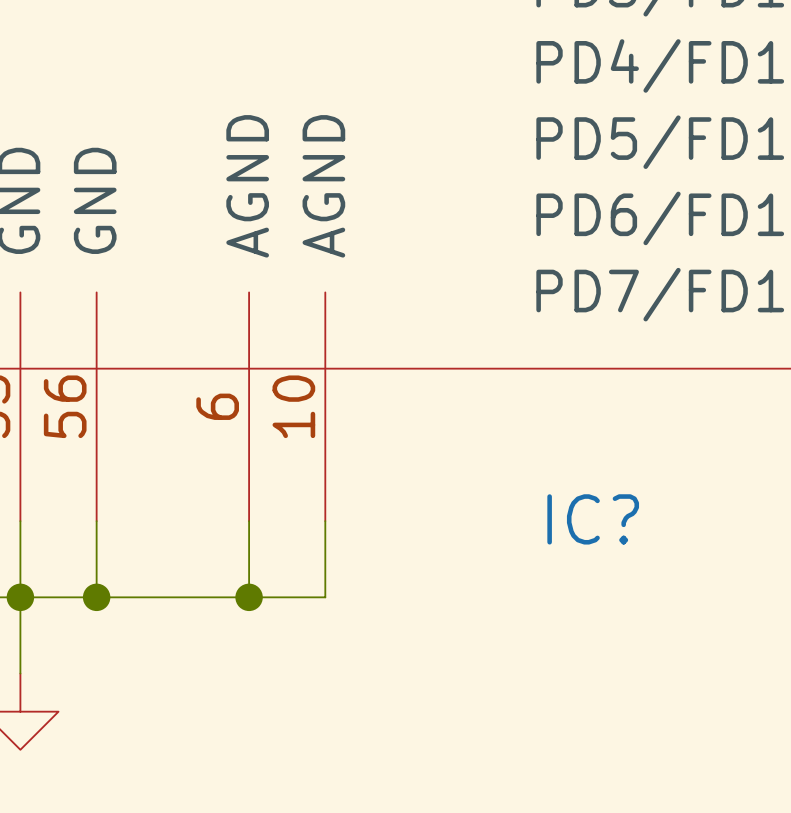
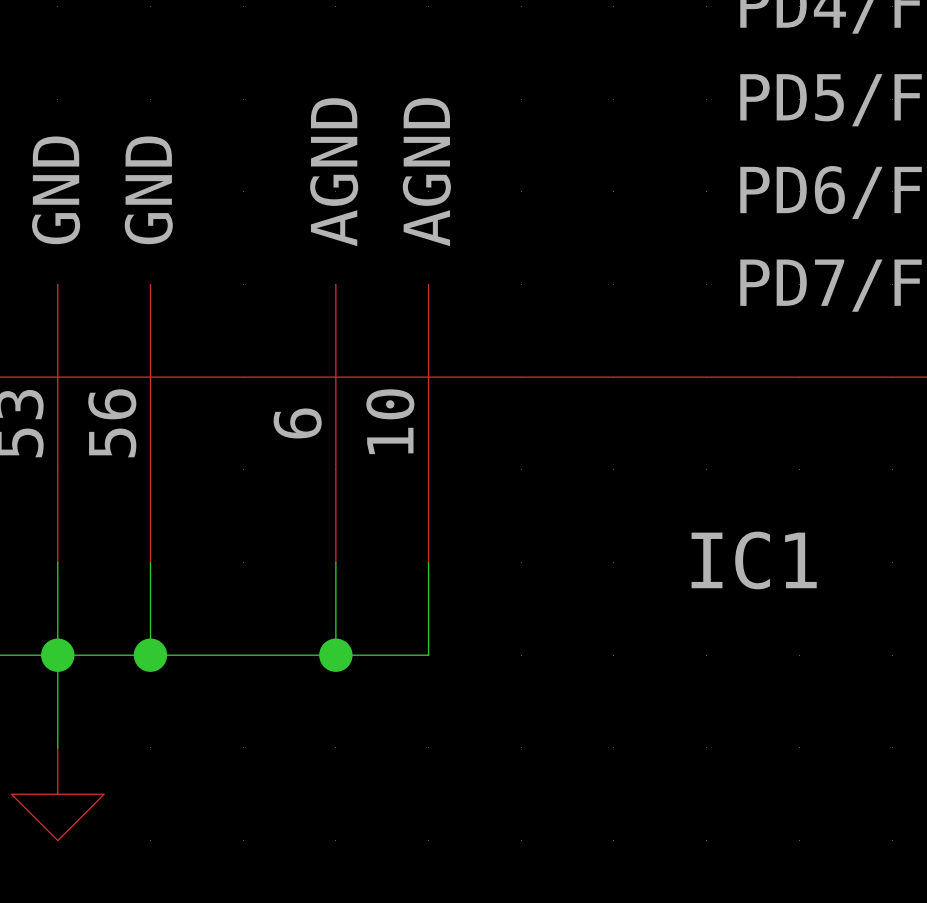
IC? name: IC? (593, 519) -> IC1 (754, 560)

